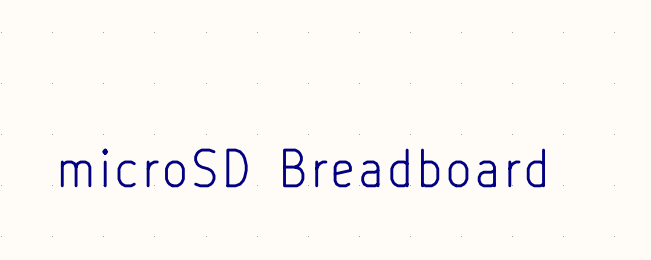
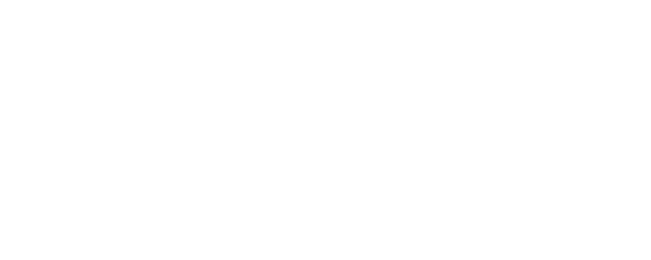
text: microSD Breadboard (302, 167) -> none

